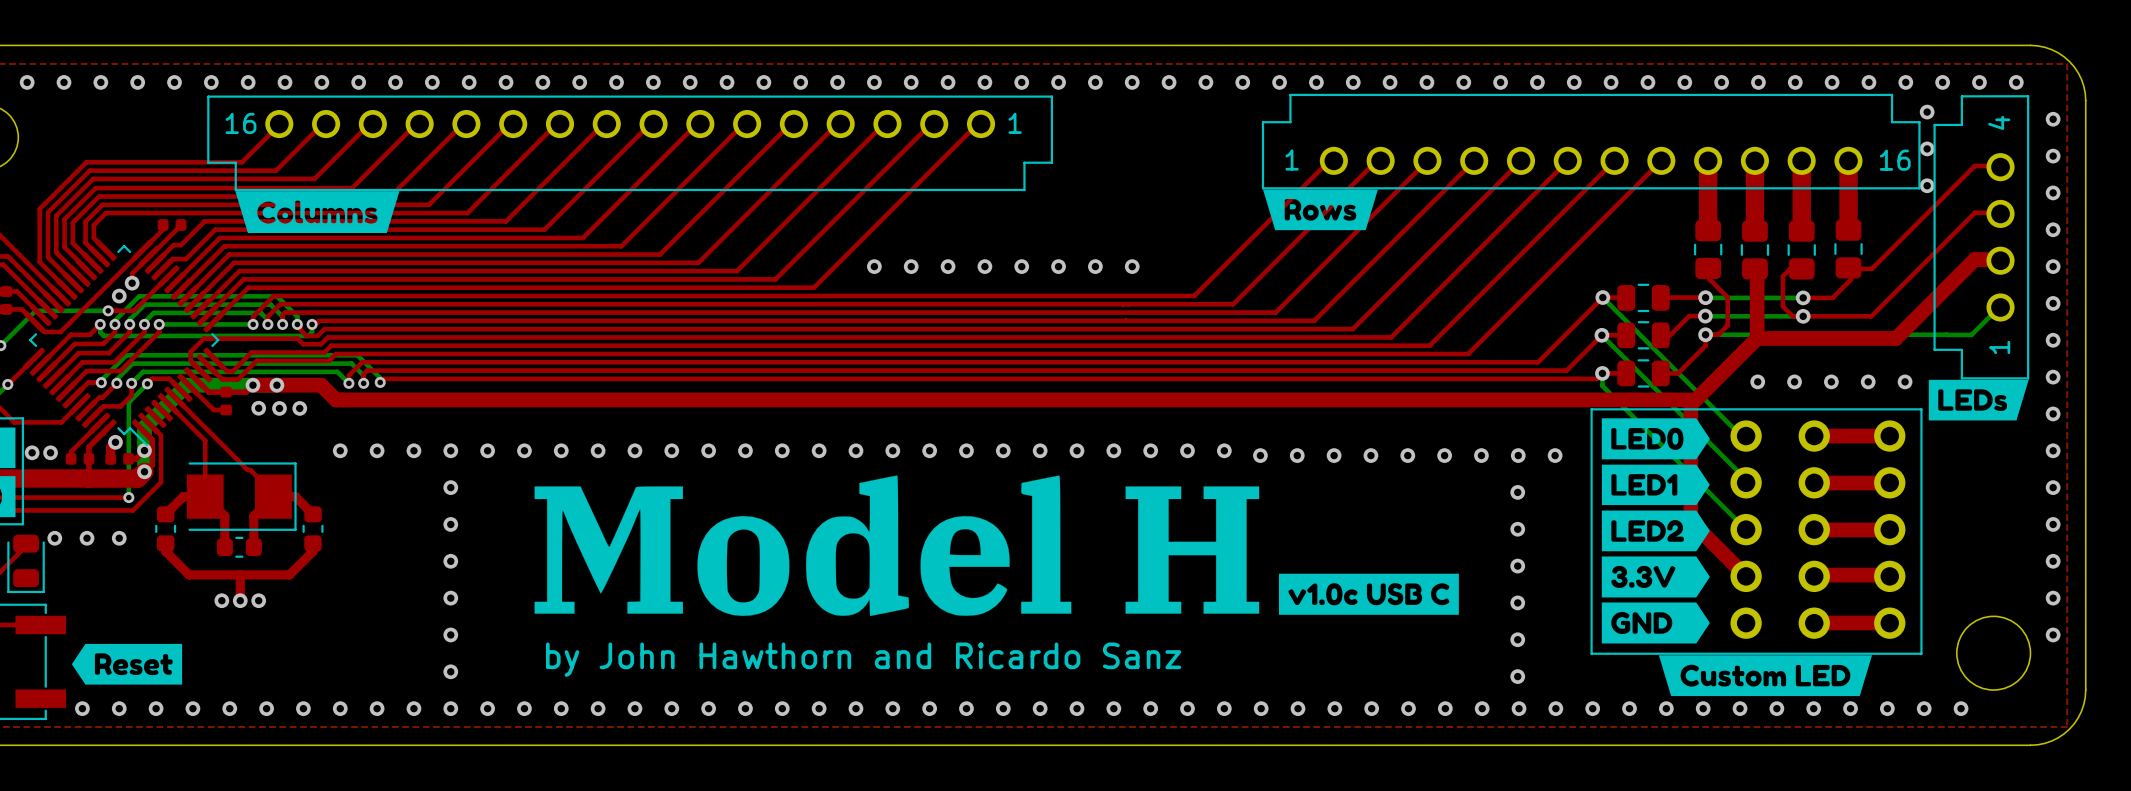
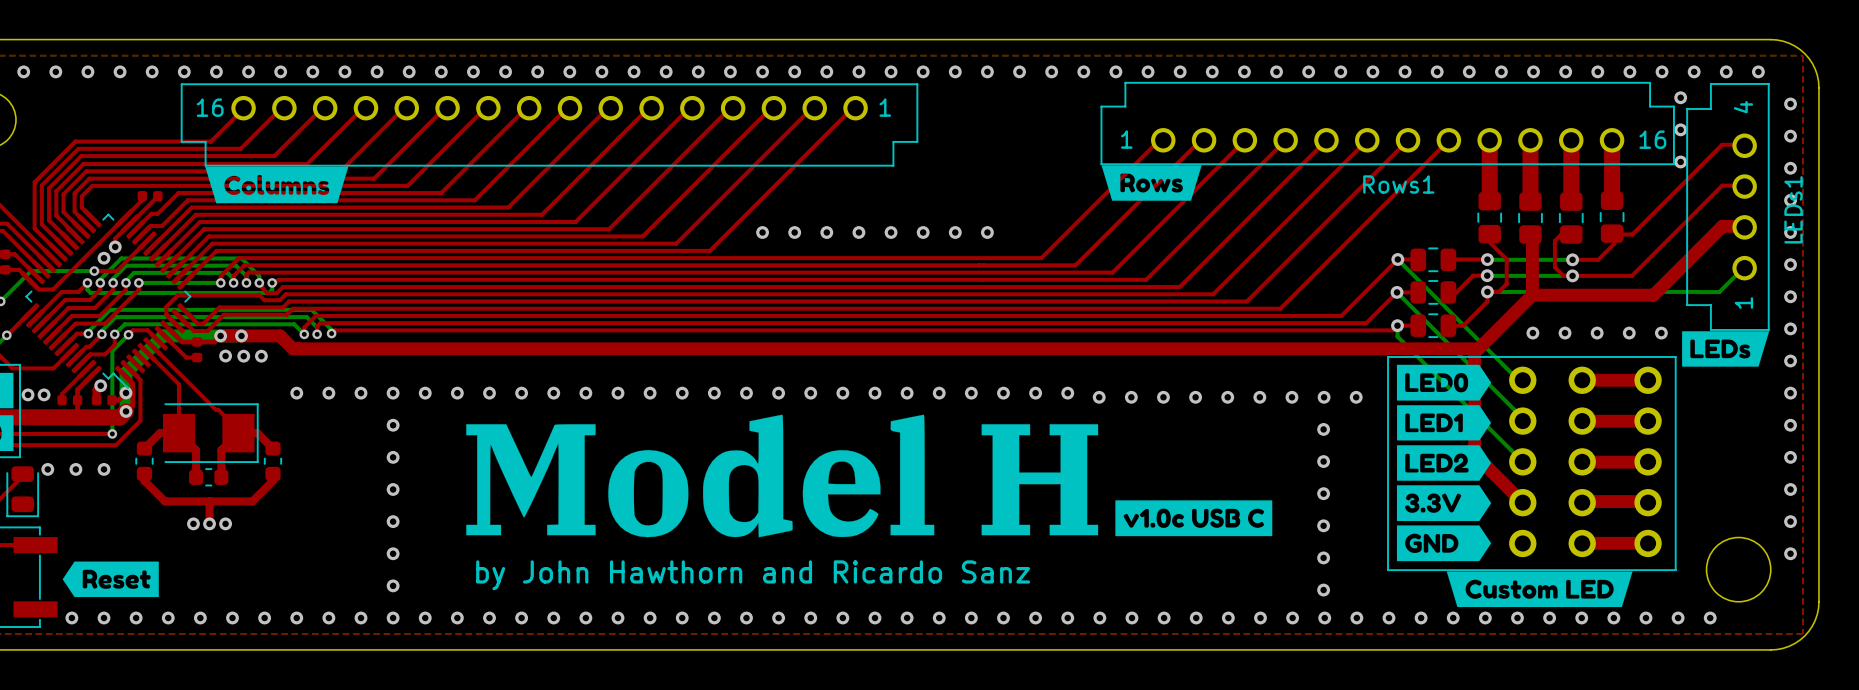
Rows1 name: none -> Rows1 (1398, 184)
LEDs1 name: none -> LEDs1 (1793, 209)

